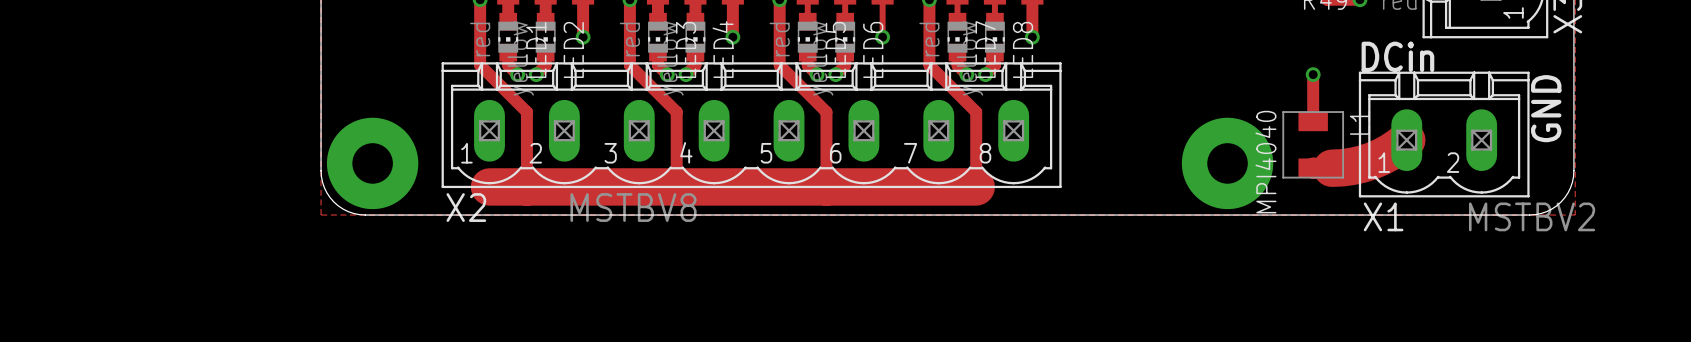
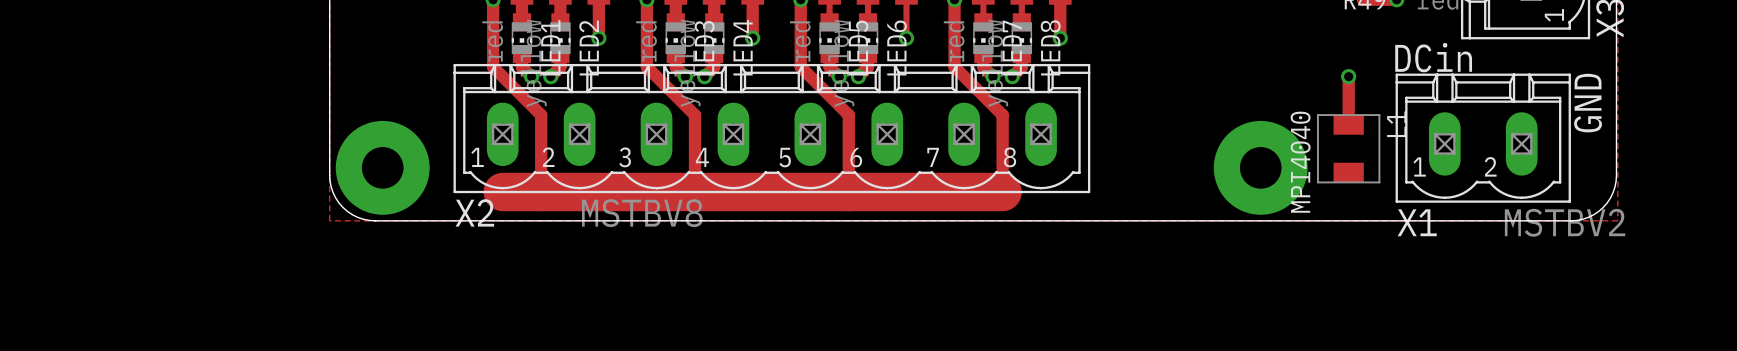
track: (1406, 140) (1390, 152) (1362, 164) (1342, 167) (1313, 168) -> none

